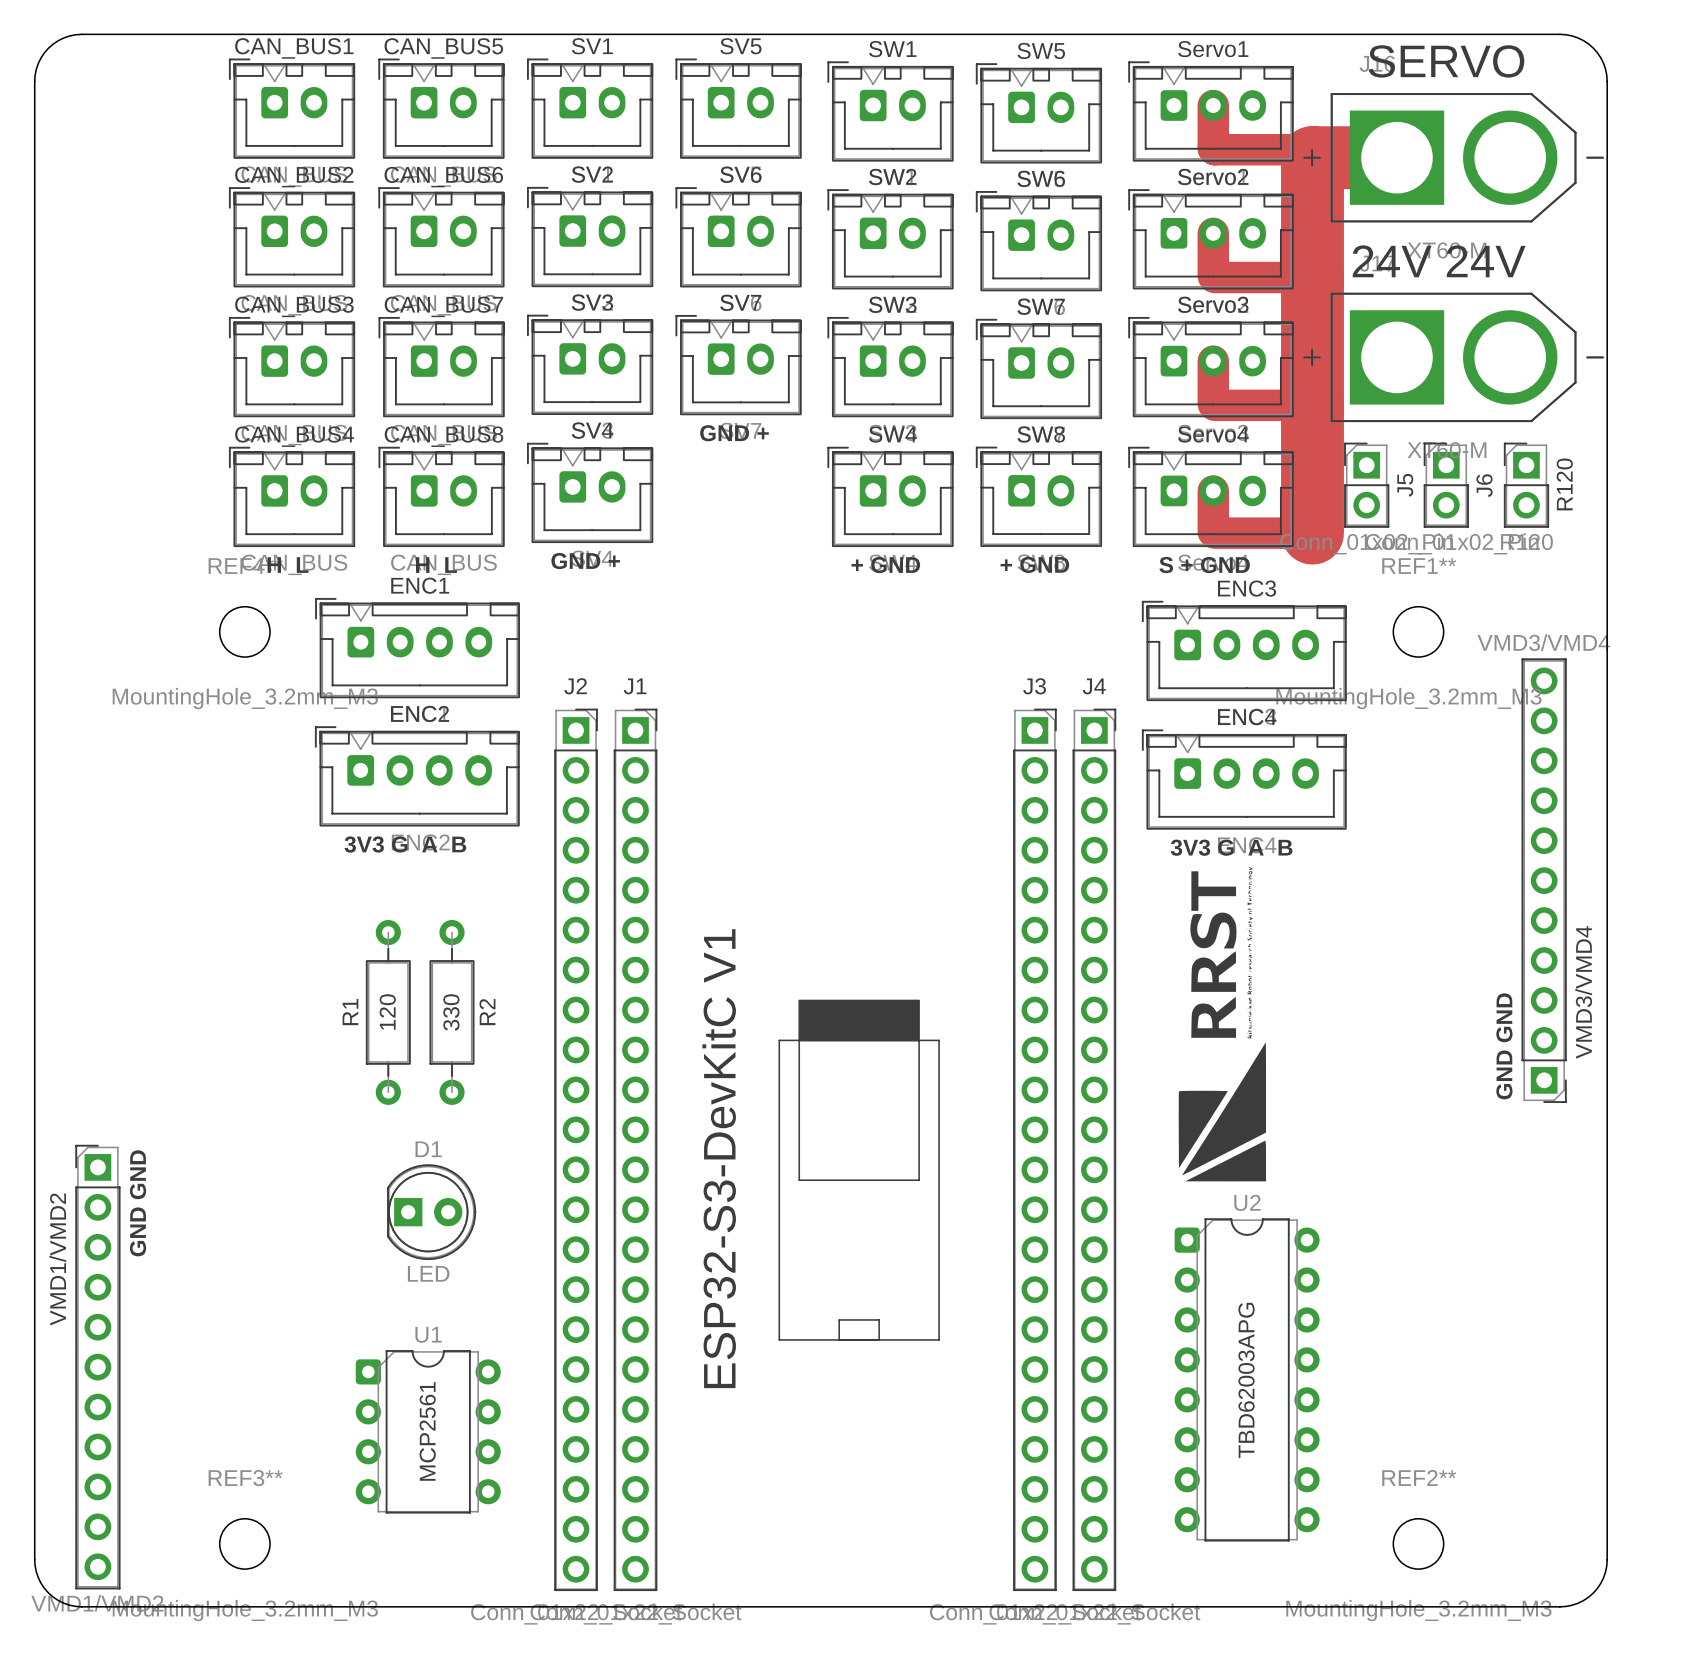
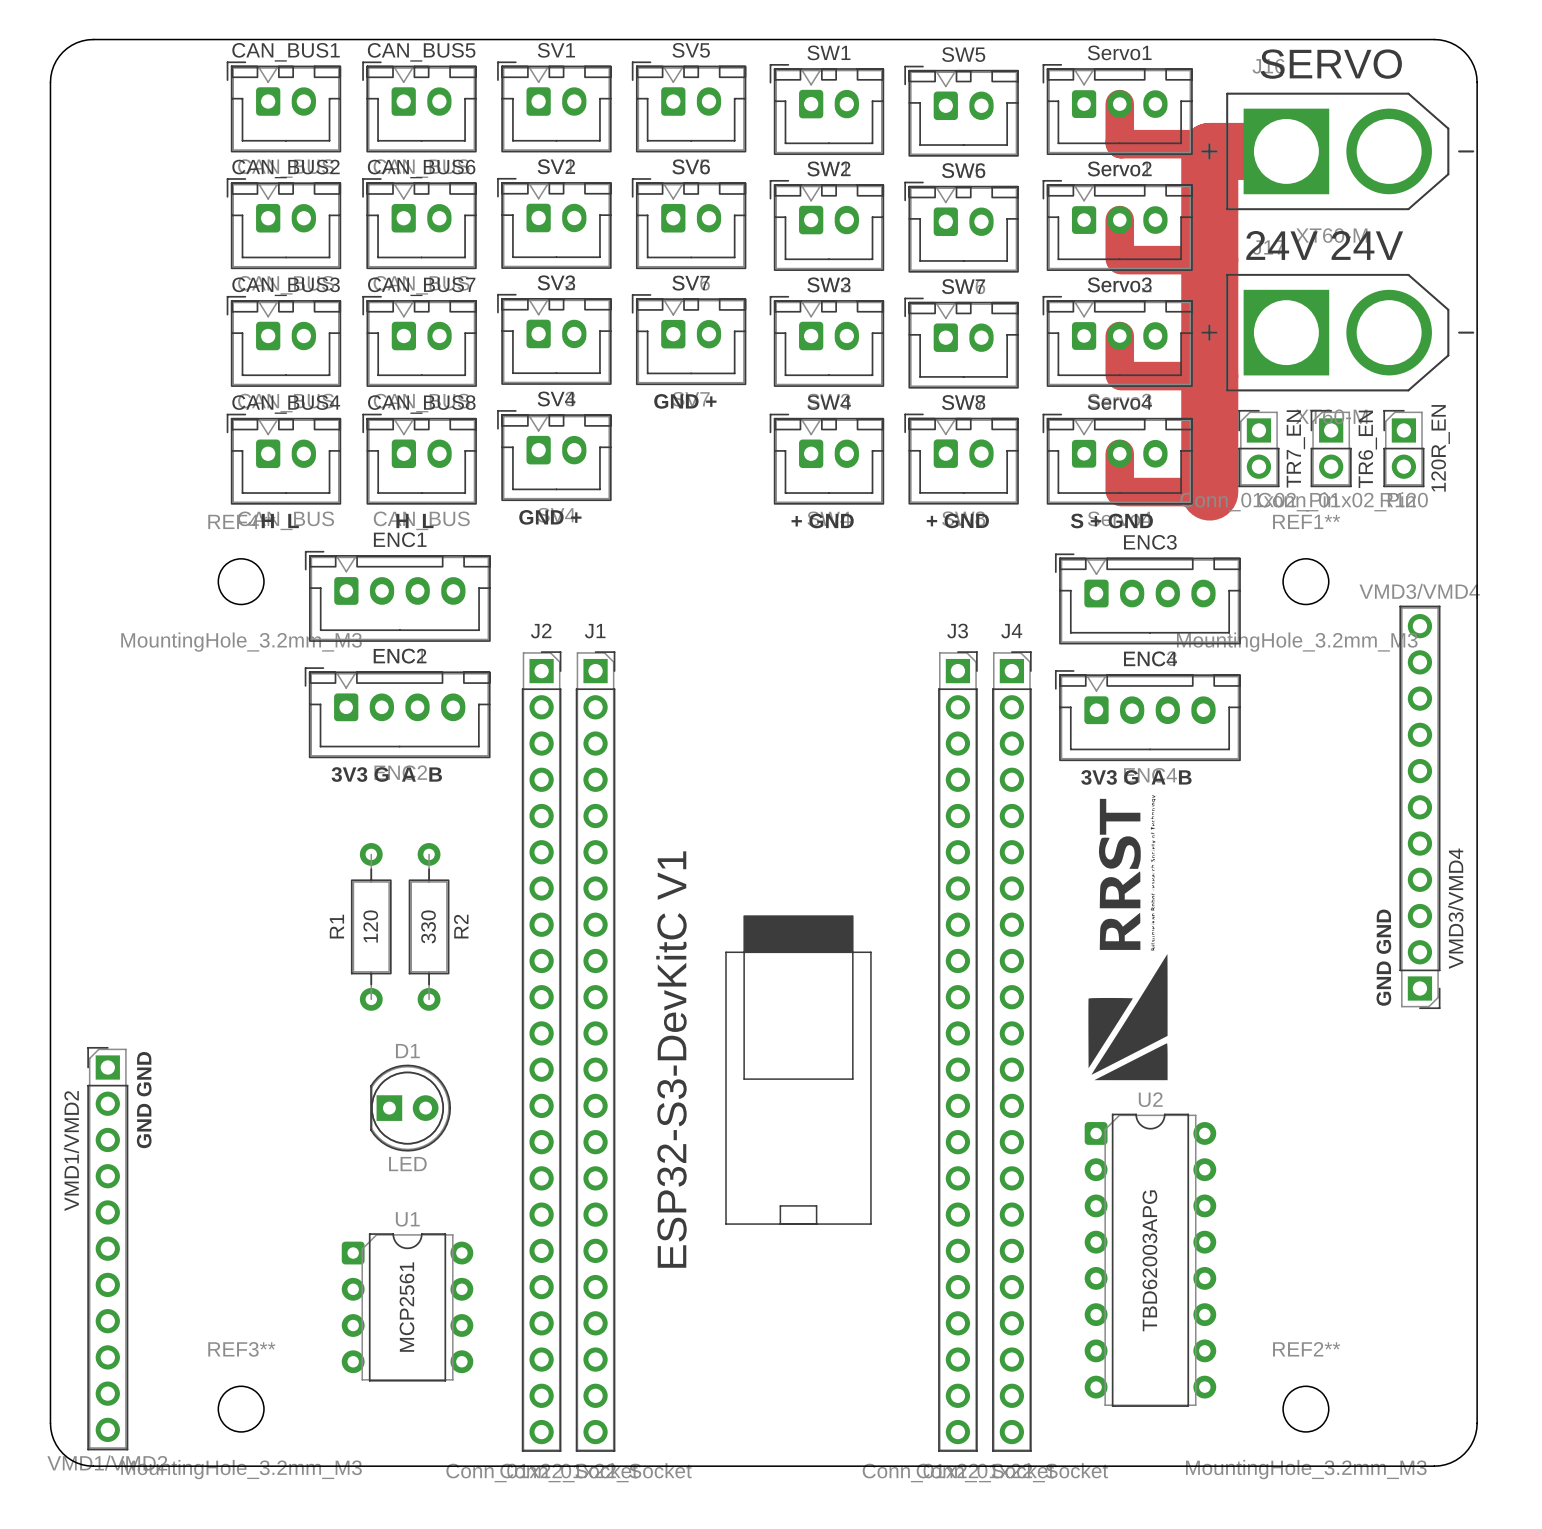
R120 name: R120 (1564, 484) -> 120R_EN (1440, 448)
J5 name: J5 (1405, 485) -> TR7_EN (1295, 448)
J6 name: J6 (1484, 485) -> TR6_EN (1367, 449)

